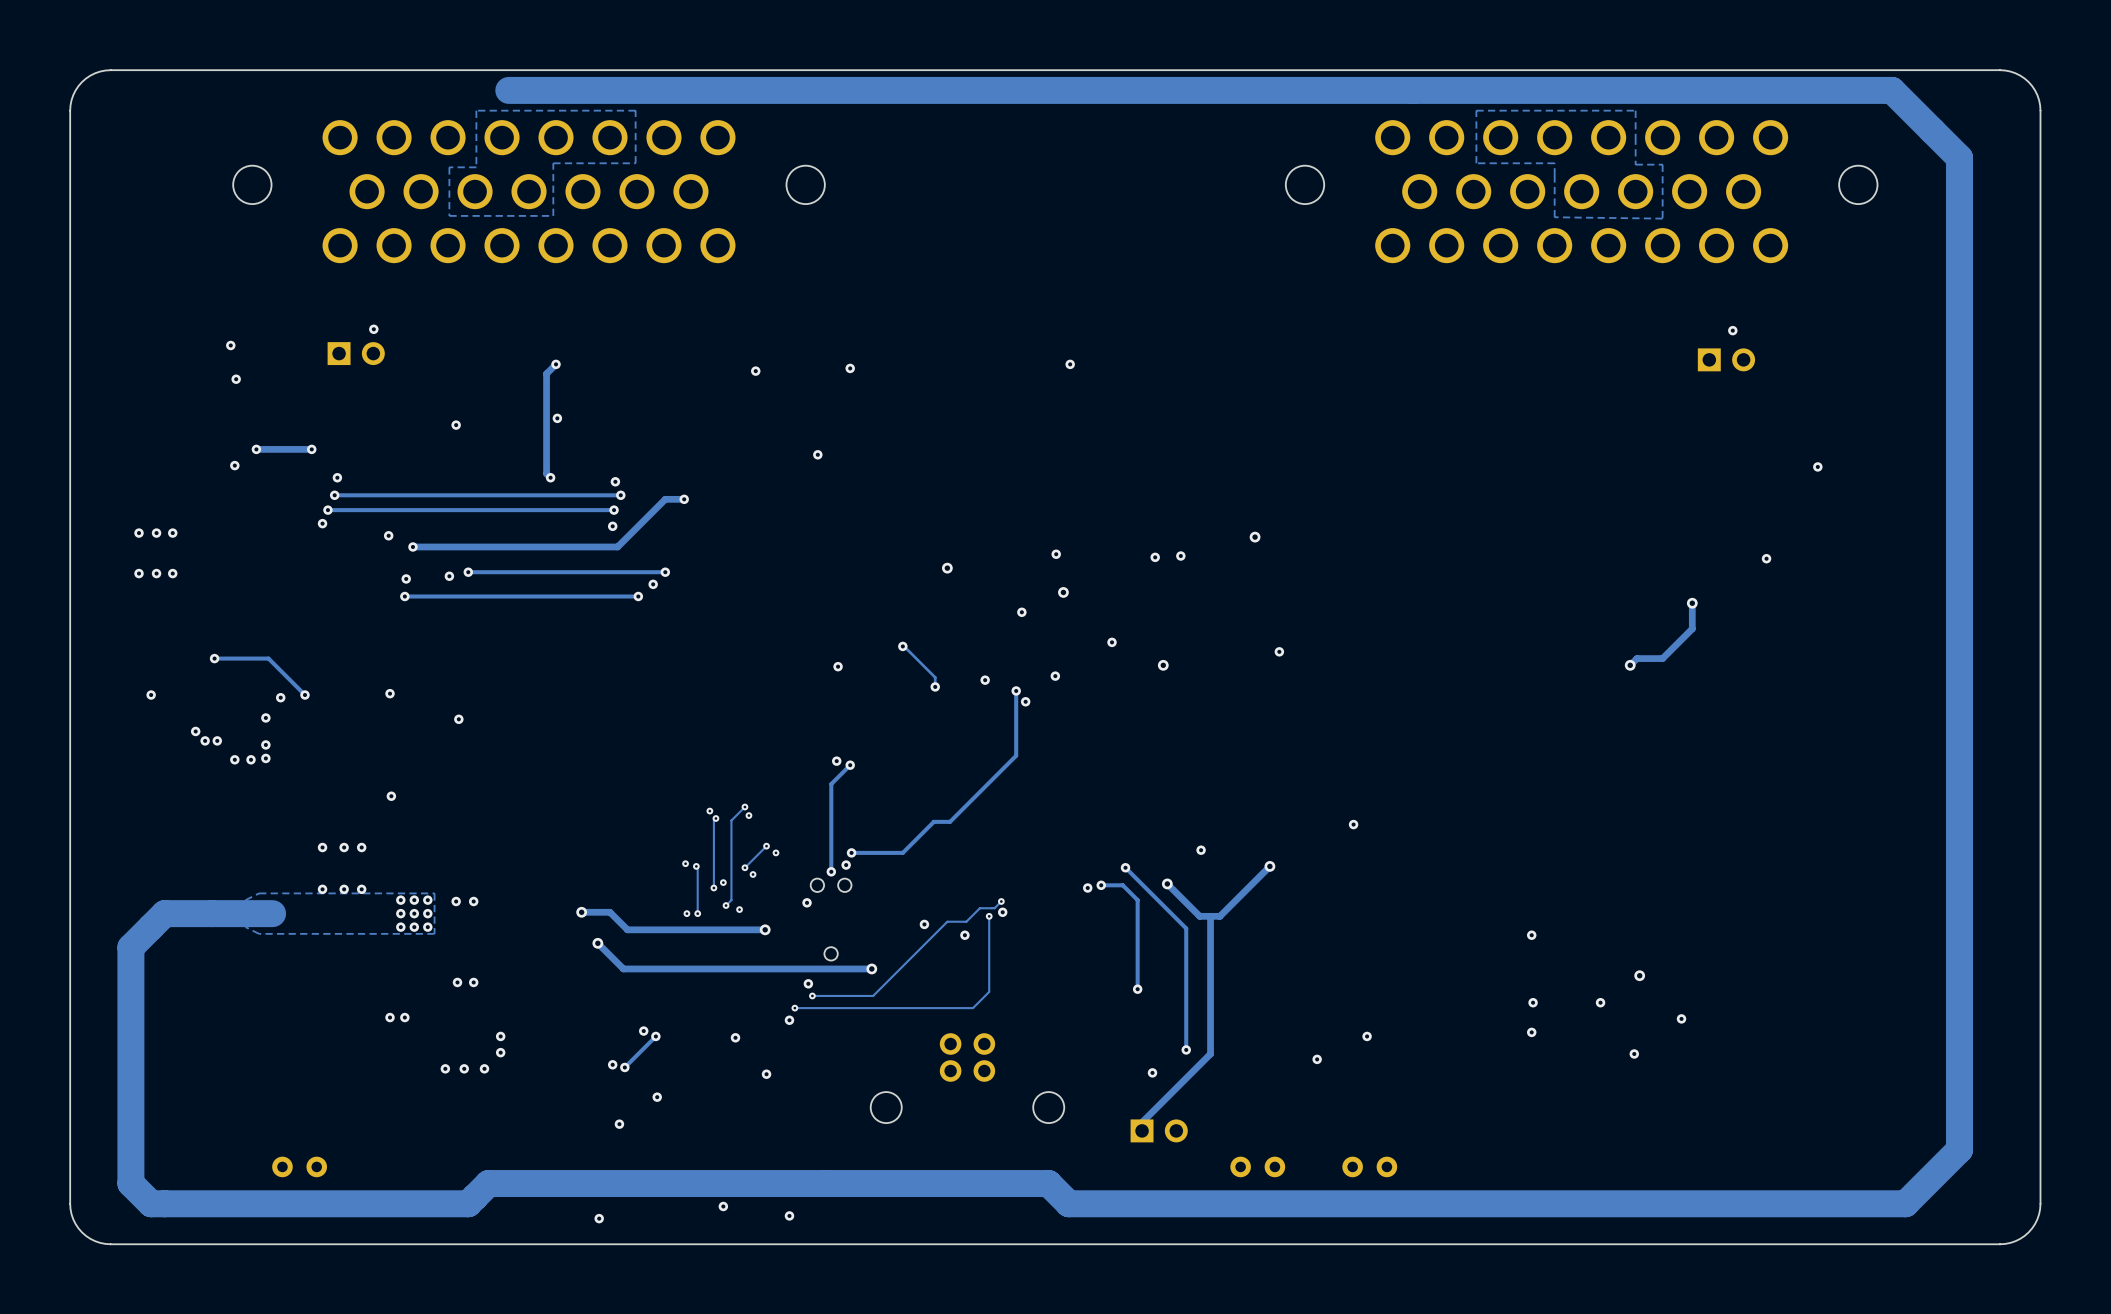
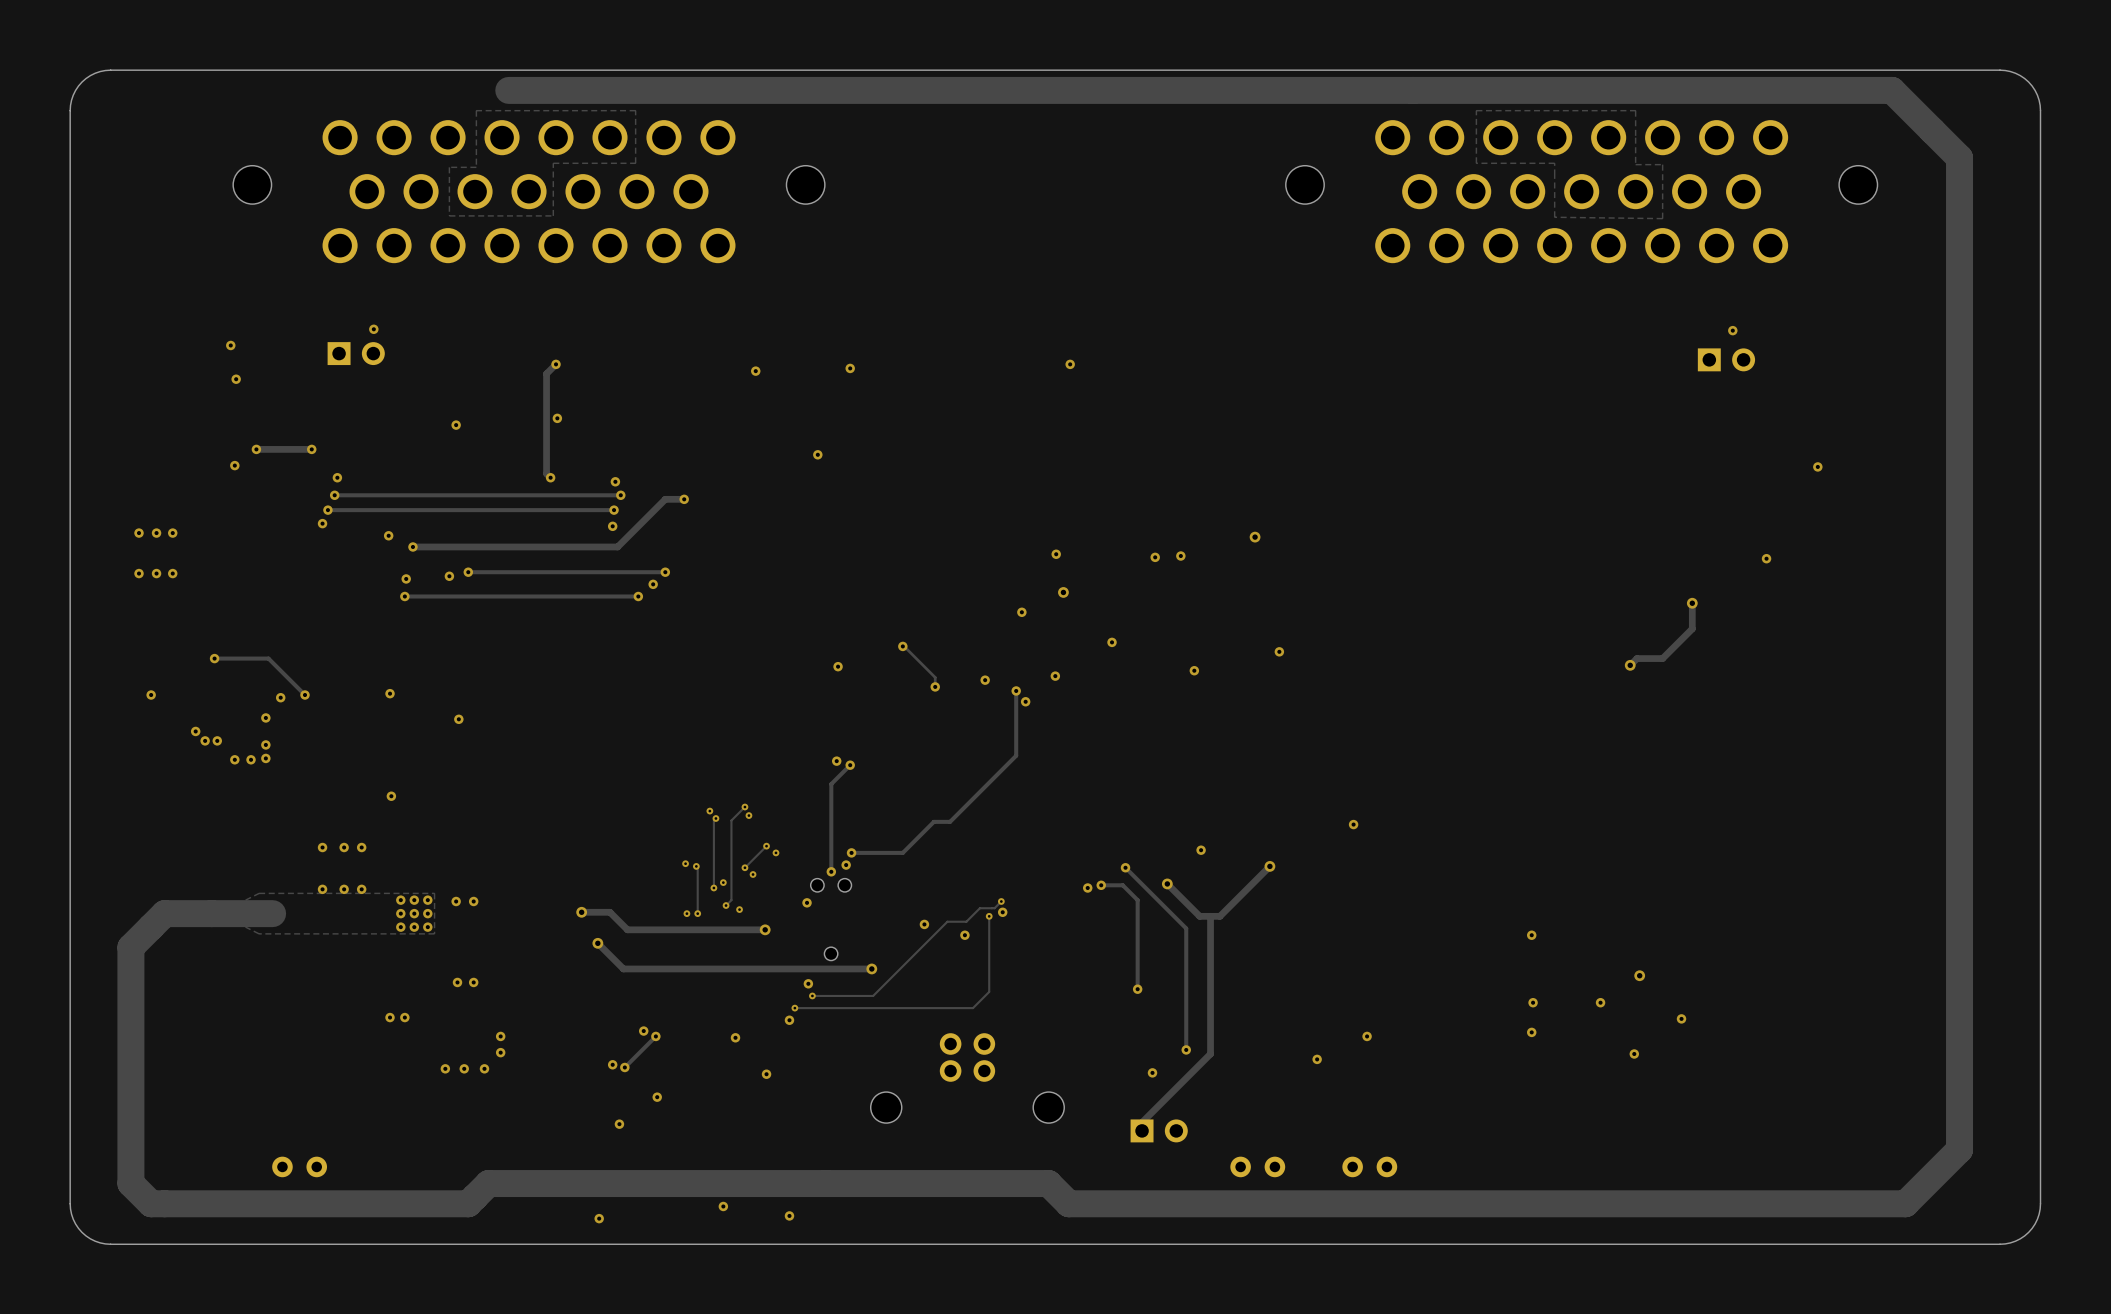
via: (947, 568) -> none
via: (1163, 665) -> none
via: none -> (1194, 670)

